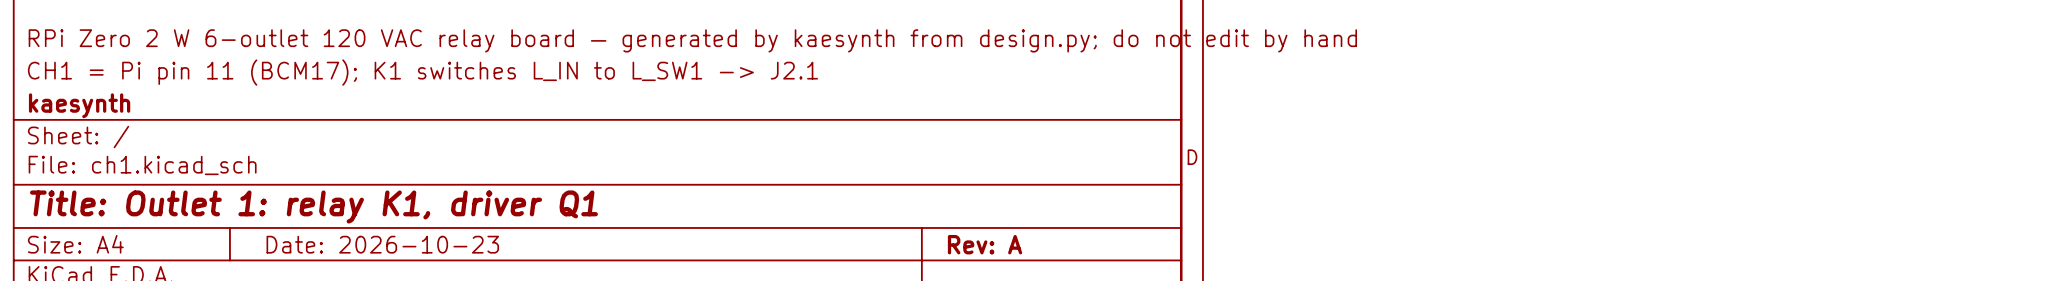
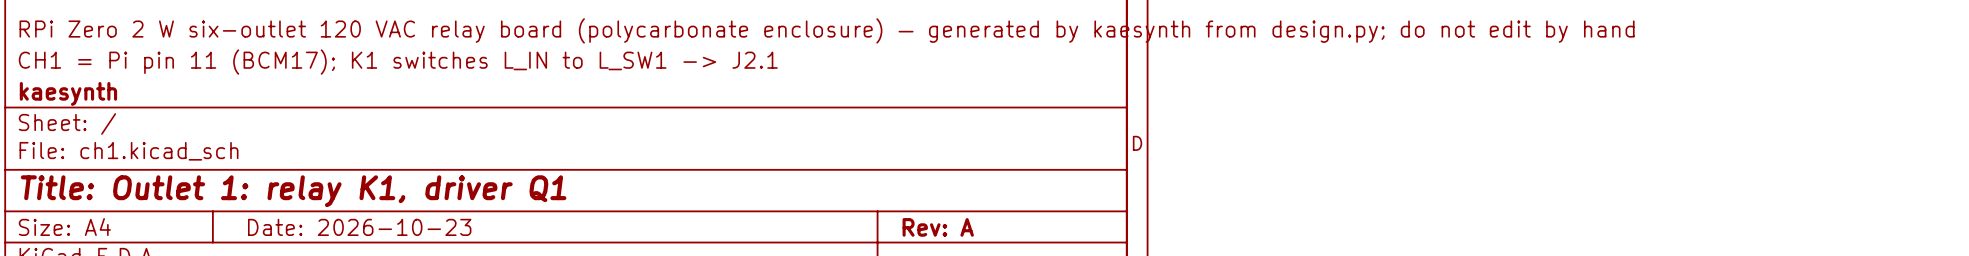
title block: RPi Zero 2 W 6-outlet 120 VAC relay board — generated by kaesynth from design.py; do not edit by hand (692, 40) -> RPi Zero 2 W six-outlet 120 VAC relay board (polycarbonate enclosure) — generated by kaesynth from design.py; do not edit by hand (827, 30)

